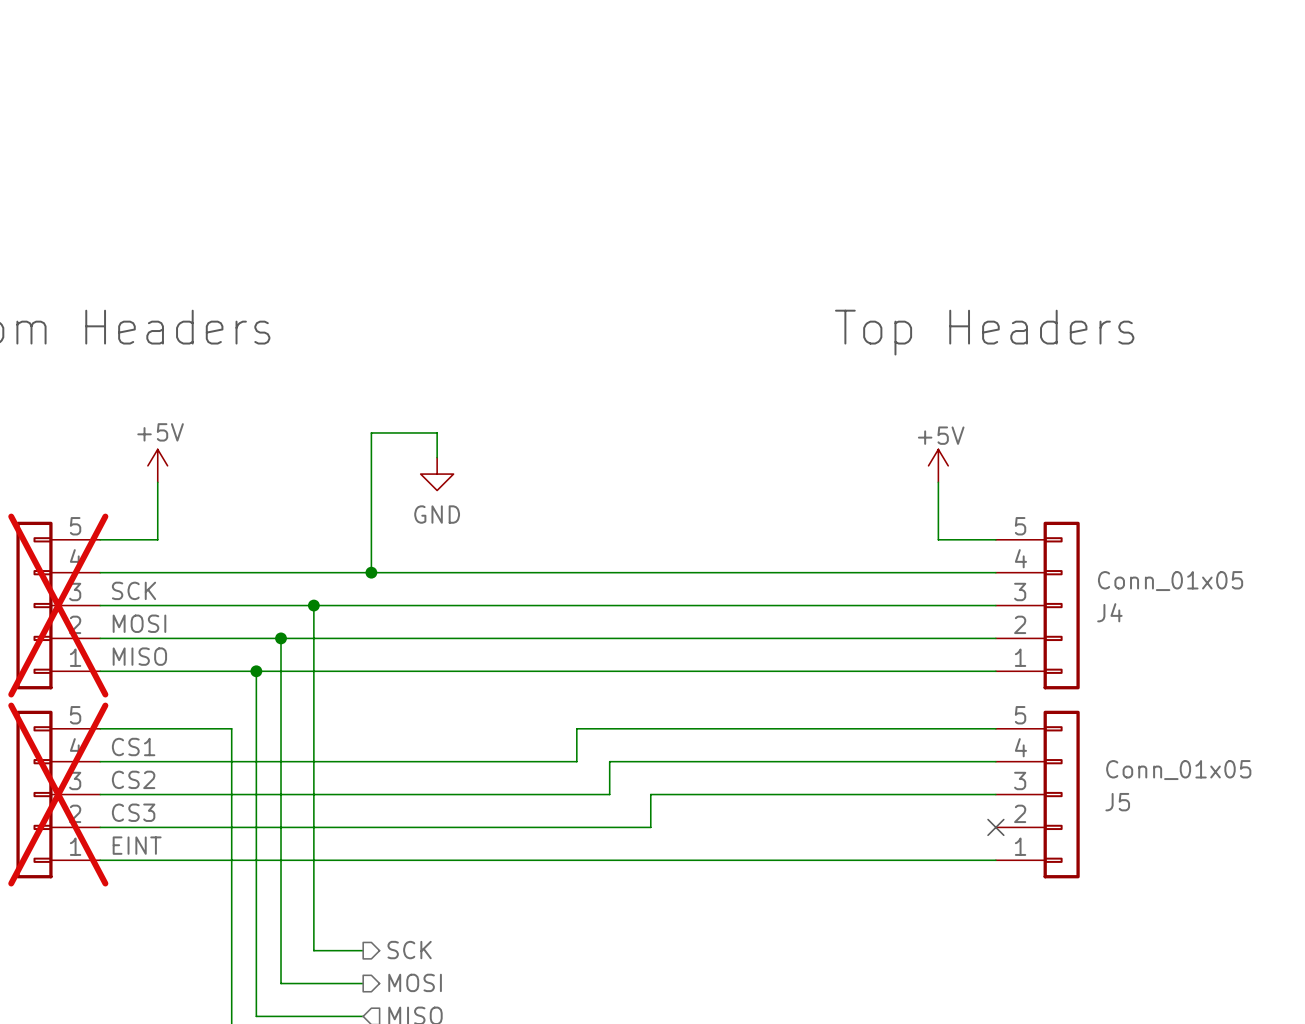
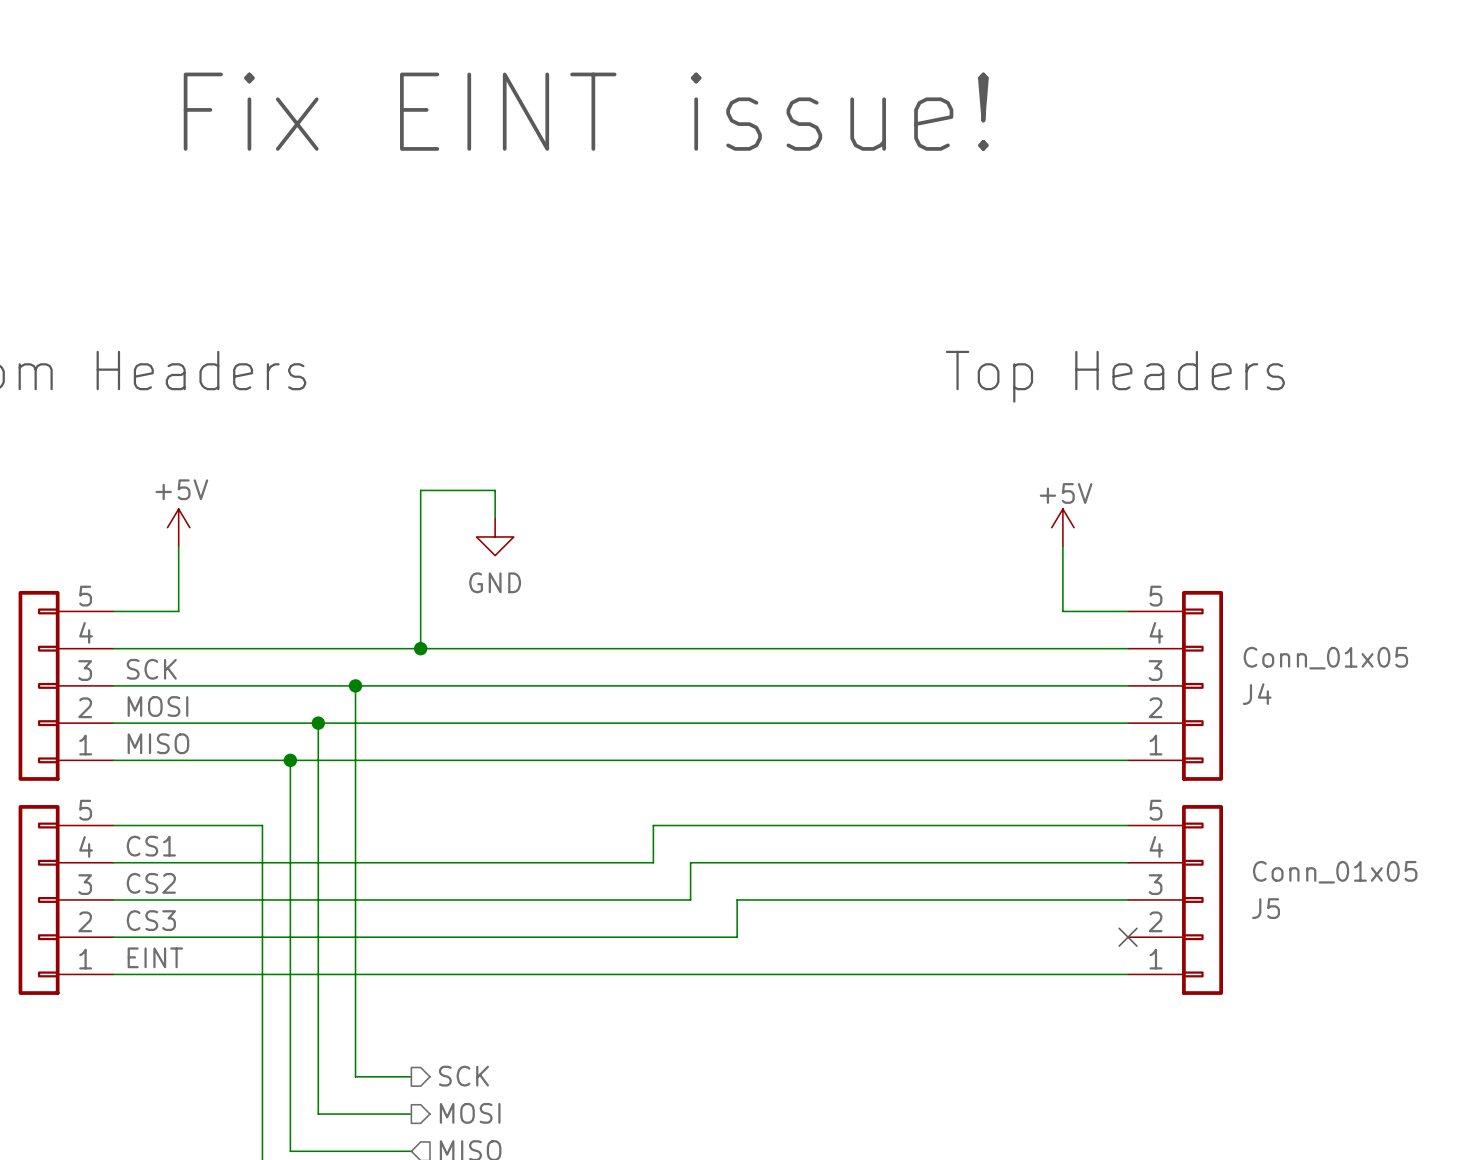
text: none -> Fix EINT issue! (586, 111)
part do-not-place cross: (58, 605) -> none
part do-not-place cross: (58, 794) -> none

